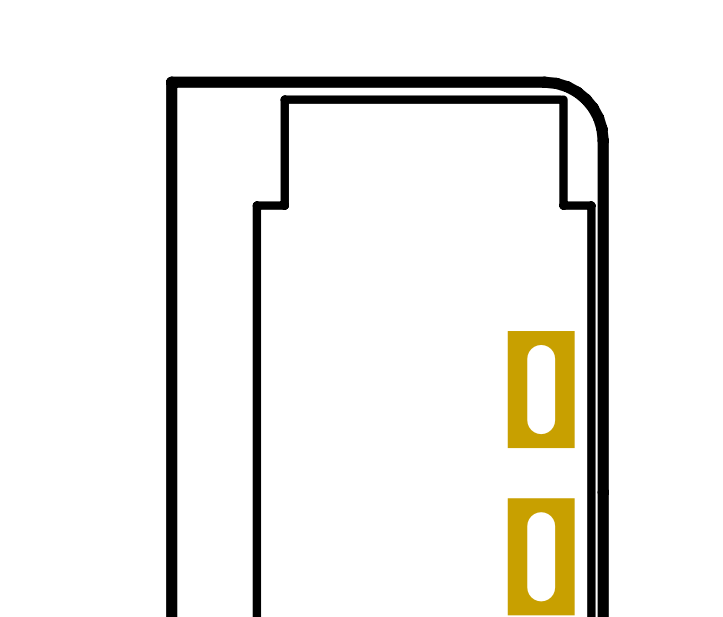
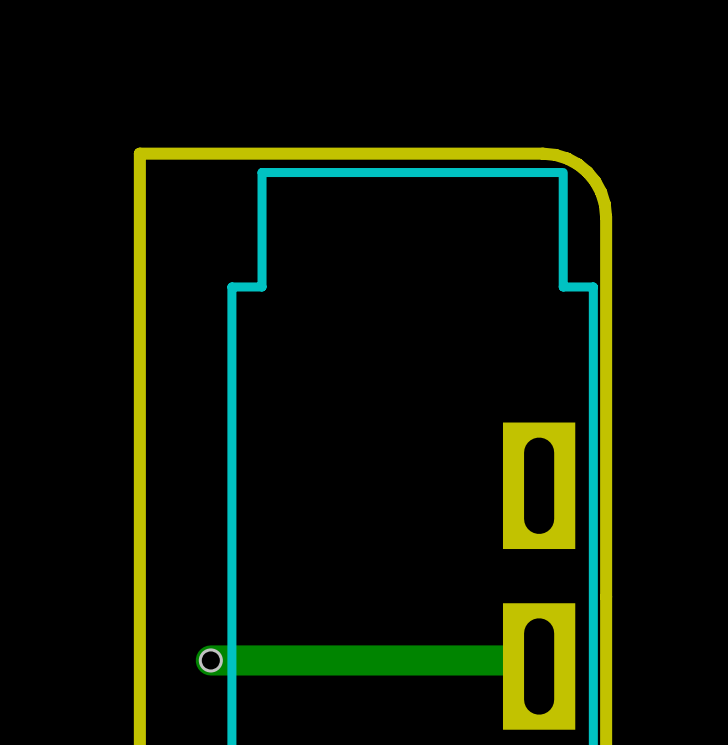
track: none -> (210, 660) (533, 660) (539, 666)
via: none -> (210, 660)

